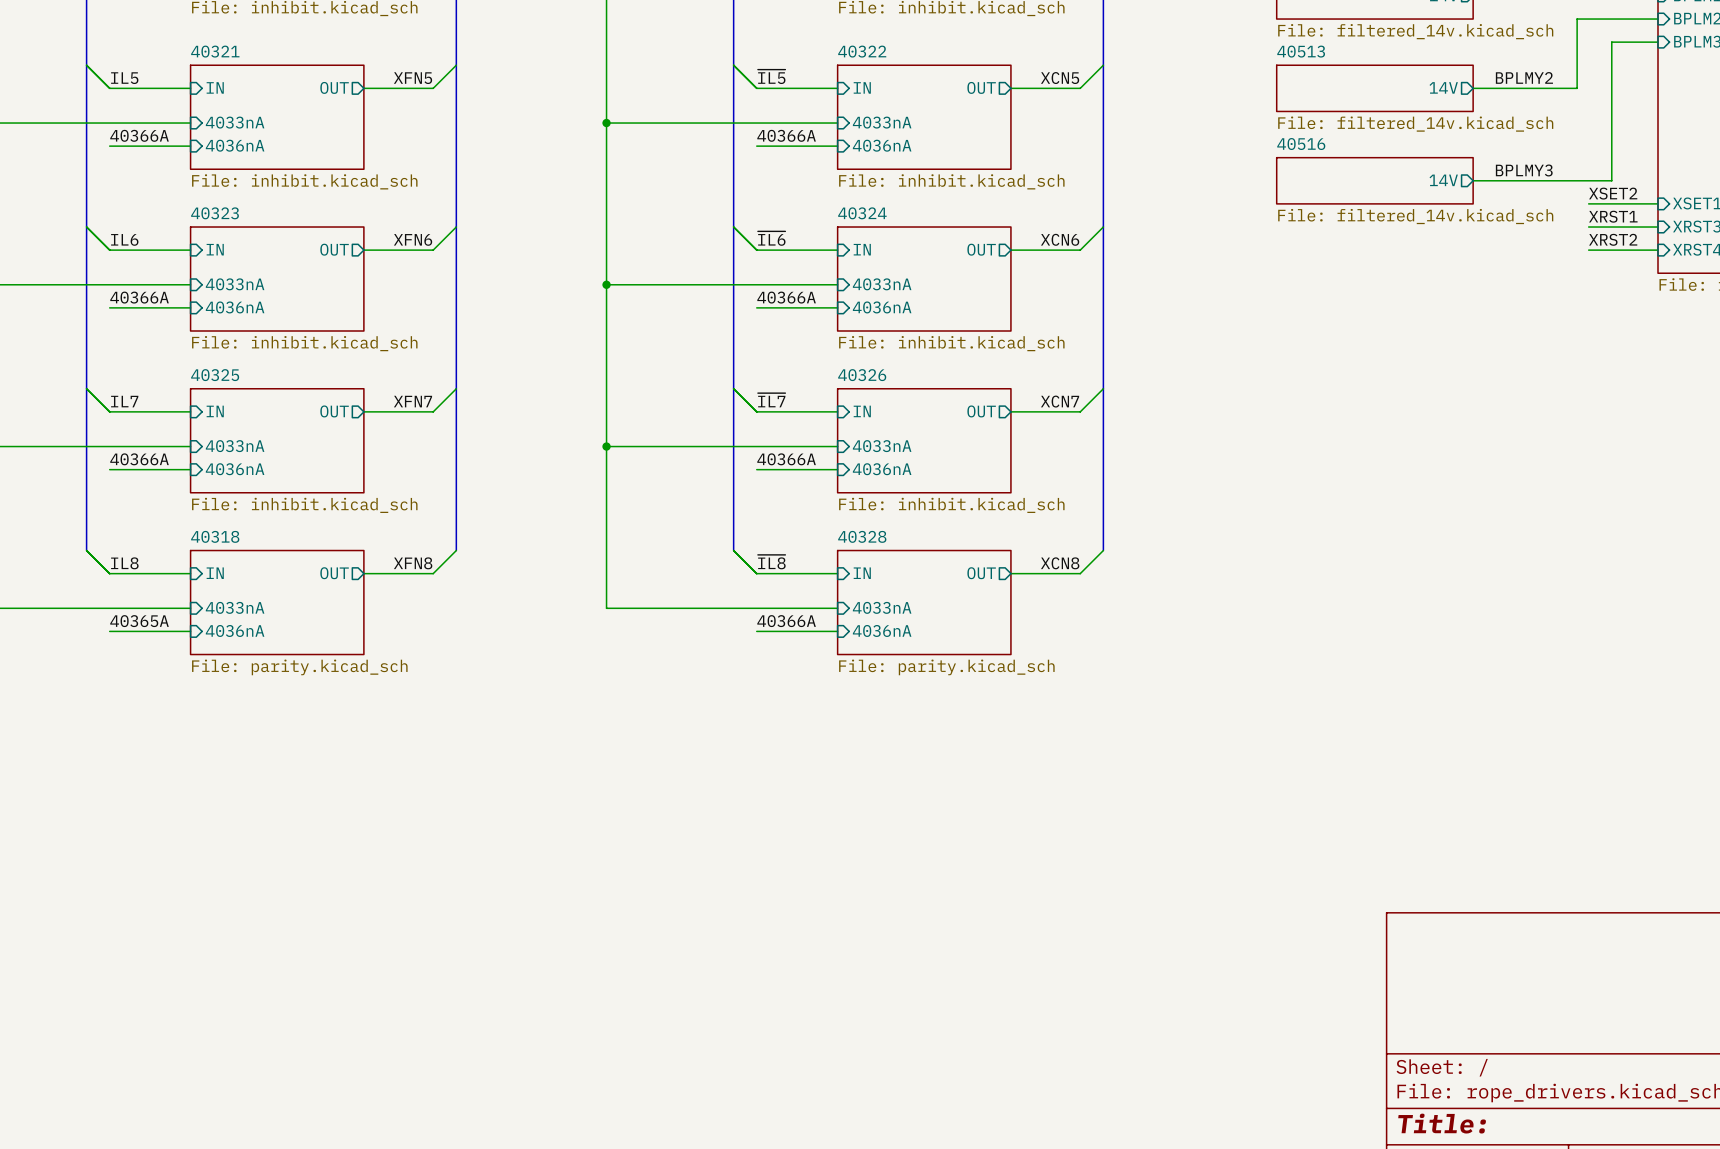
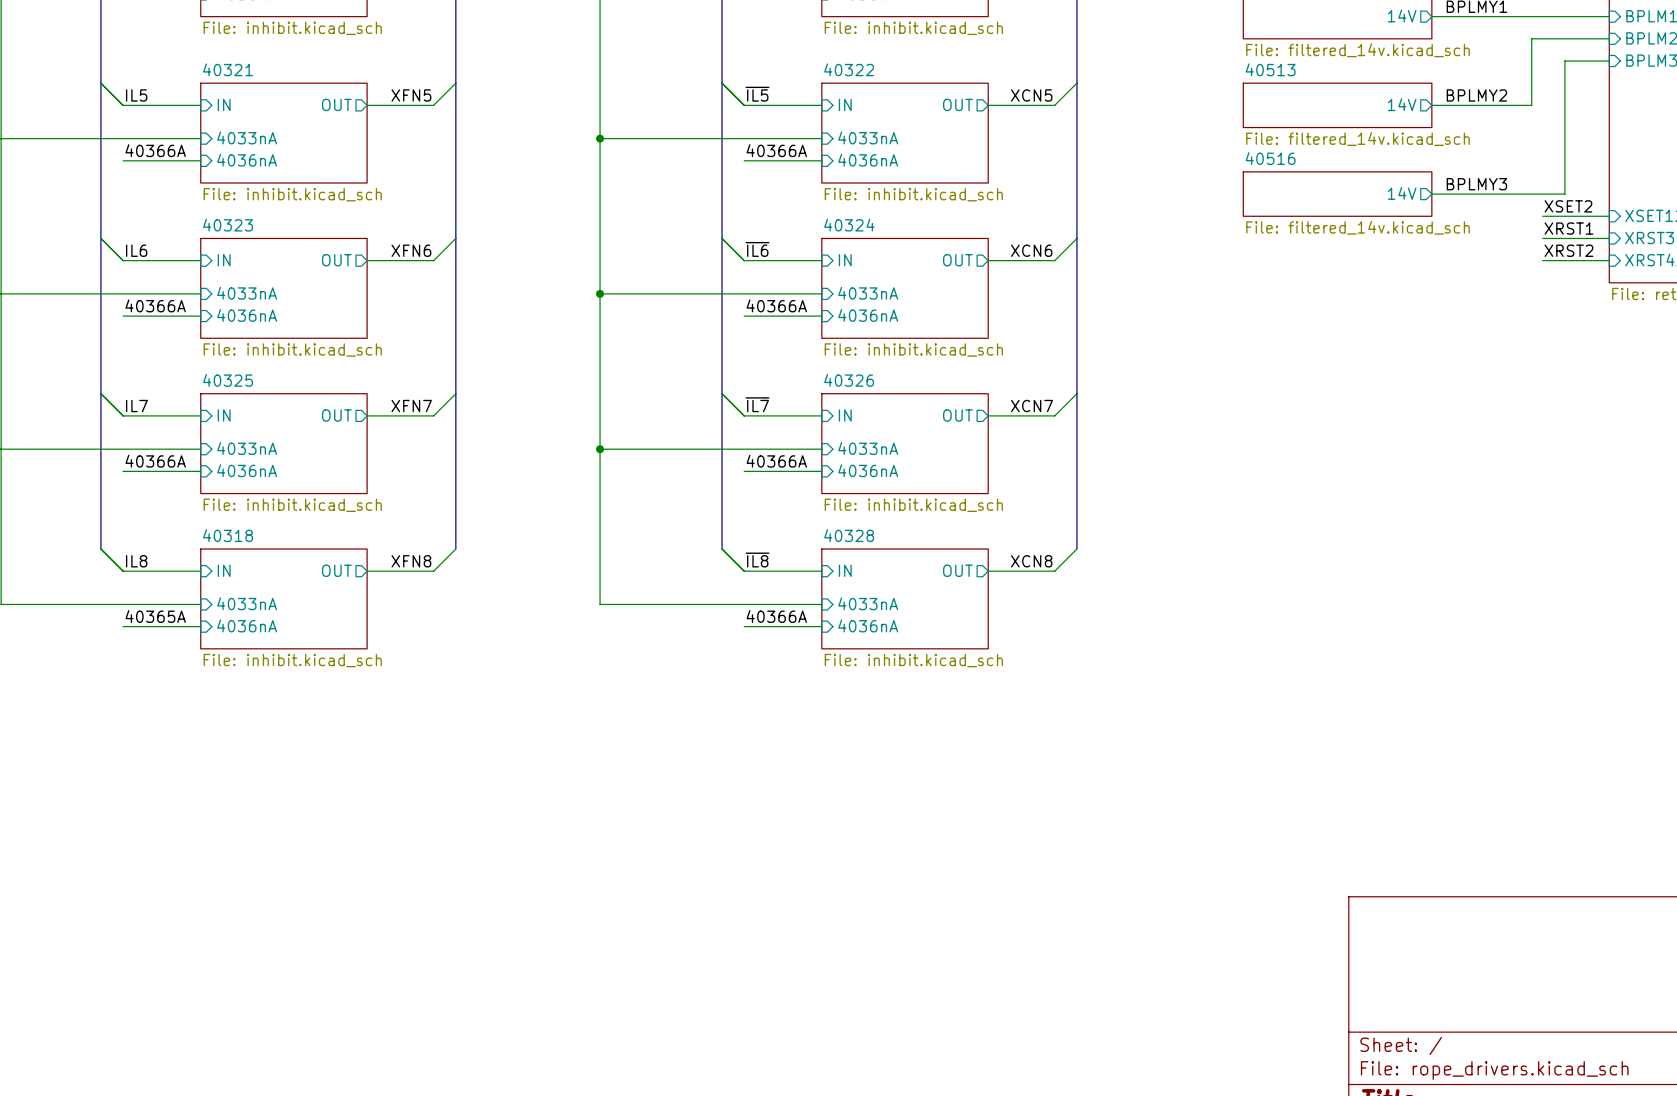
sheet 40318 value: File: parity.kicad_sch (299, 667) -> File: inhibit.kicad_sch (292, 660)
sheet 40328 value: File: parity.kicad_sch (946, 667) -> File: inhibit.kicad_sch (913, 660)

